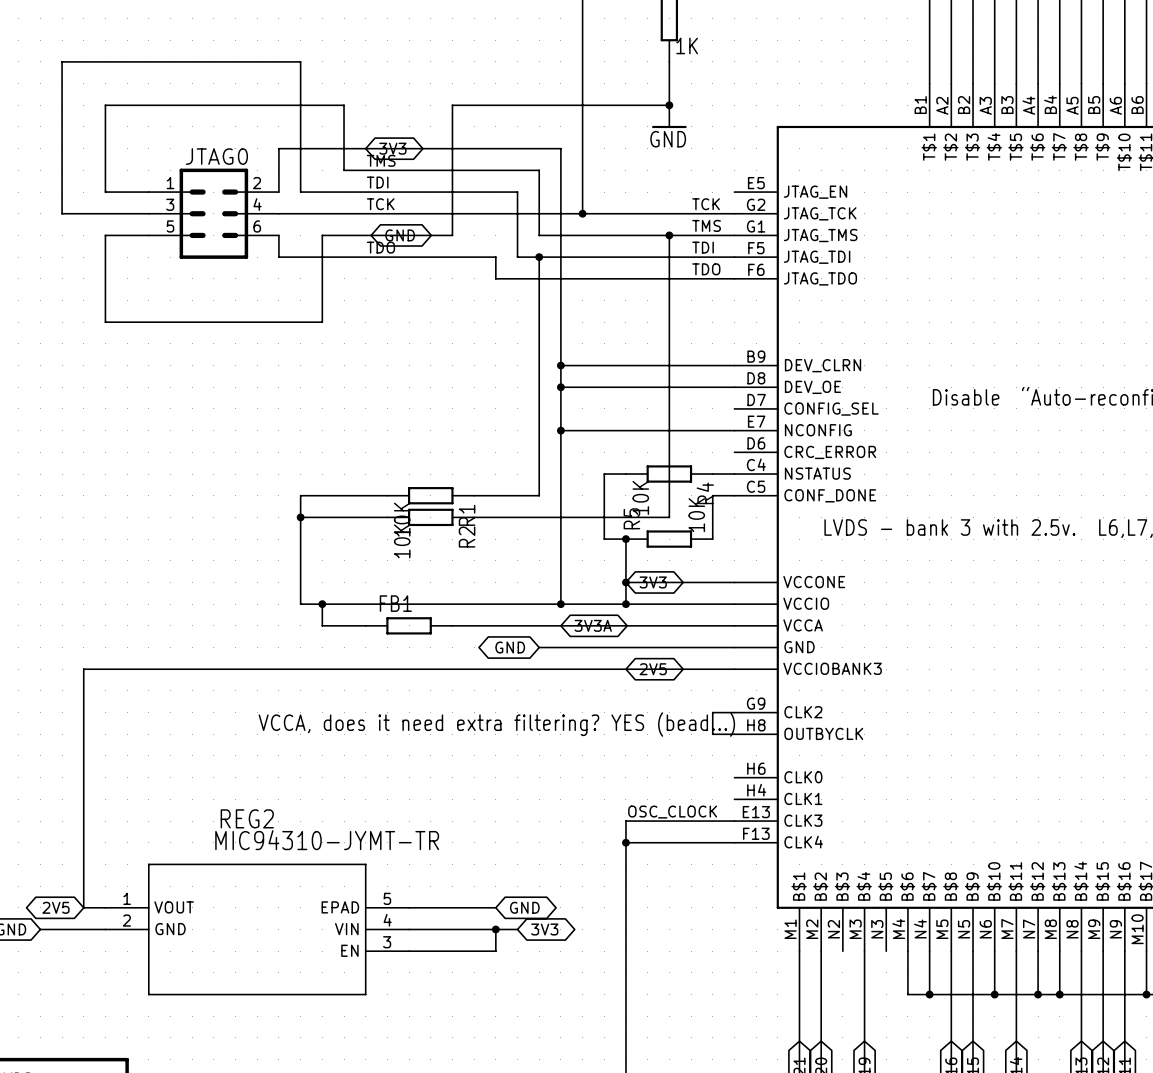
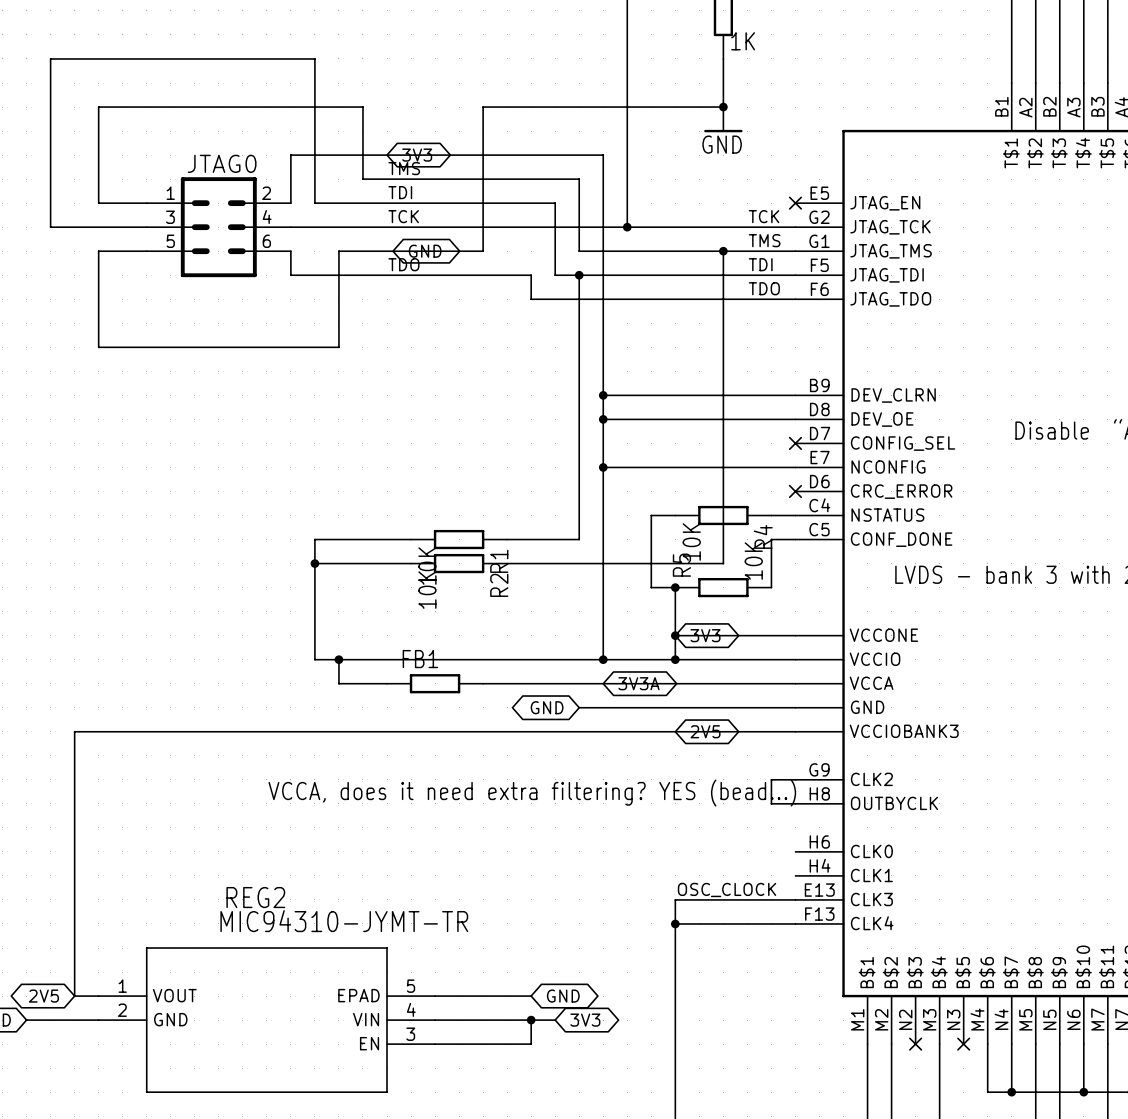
no-connect mark: none -> (795, 203)
no-connect mark: none -> (795, 443)
no-connect mark: none -> (795, 491)
no-connect mark: none -> (915, 1044)
no-connect mark: none -> (963, 1044)

